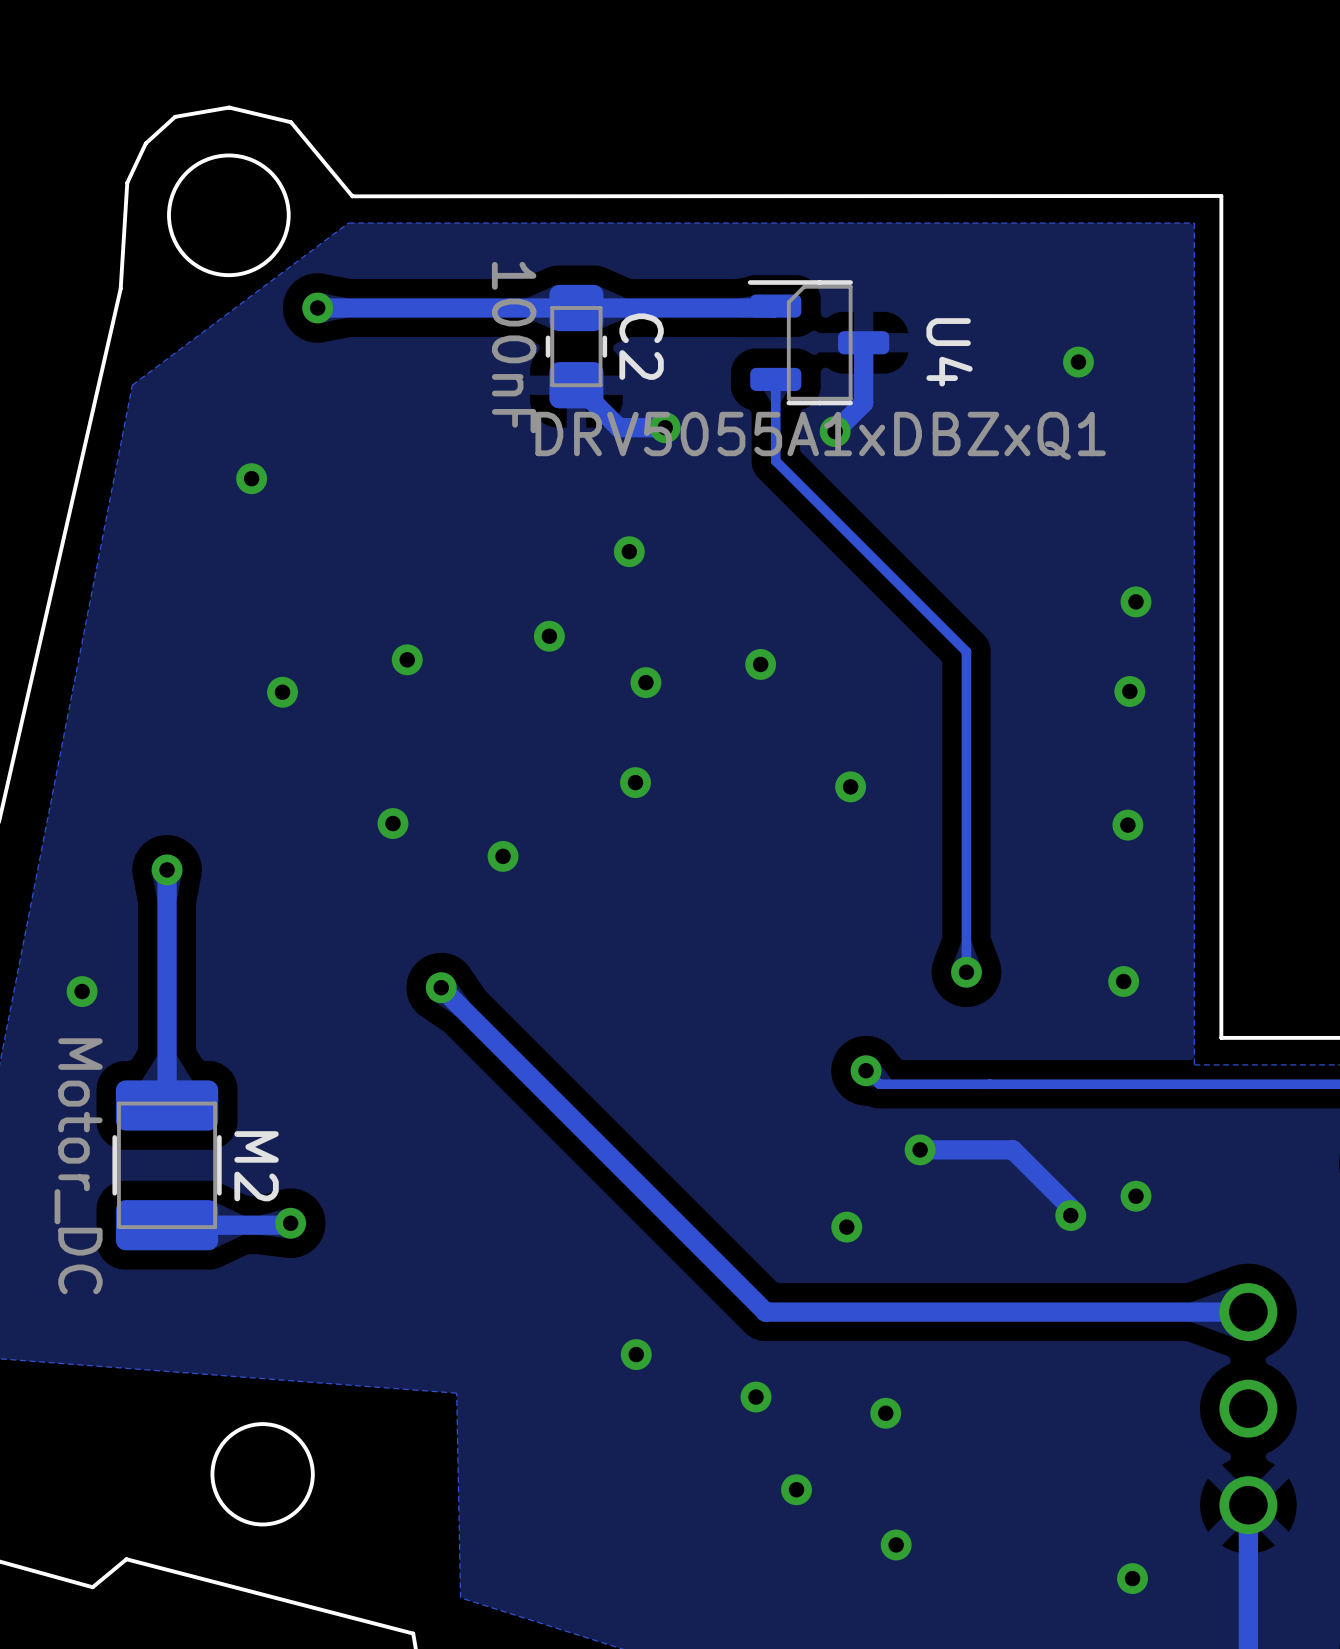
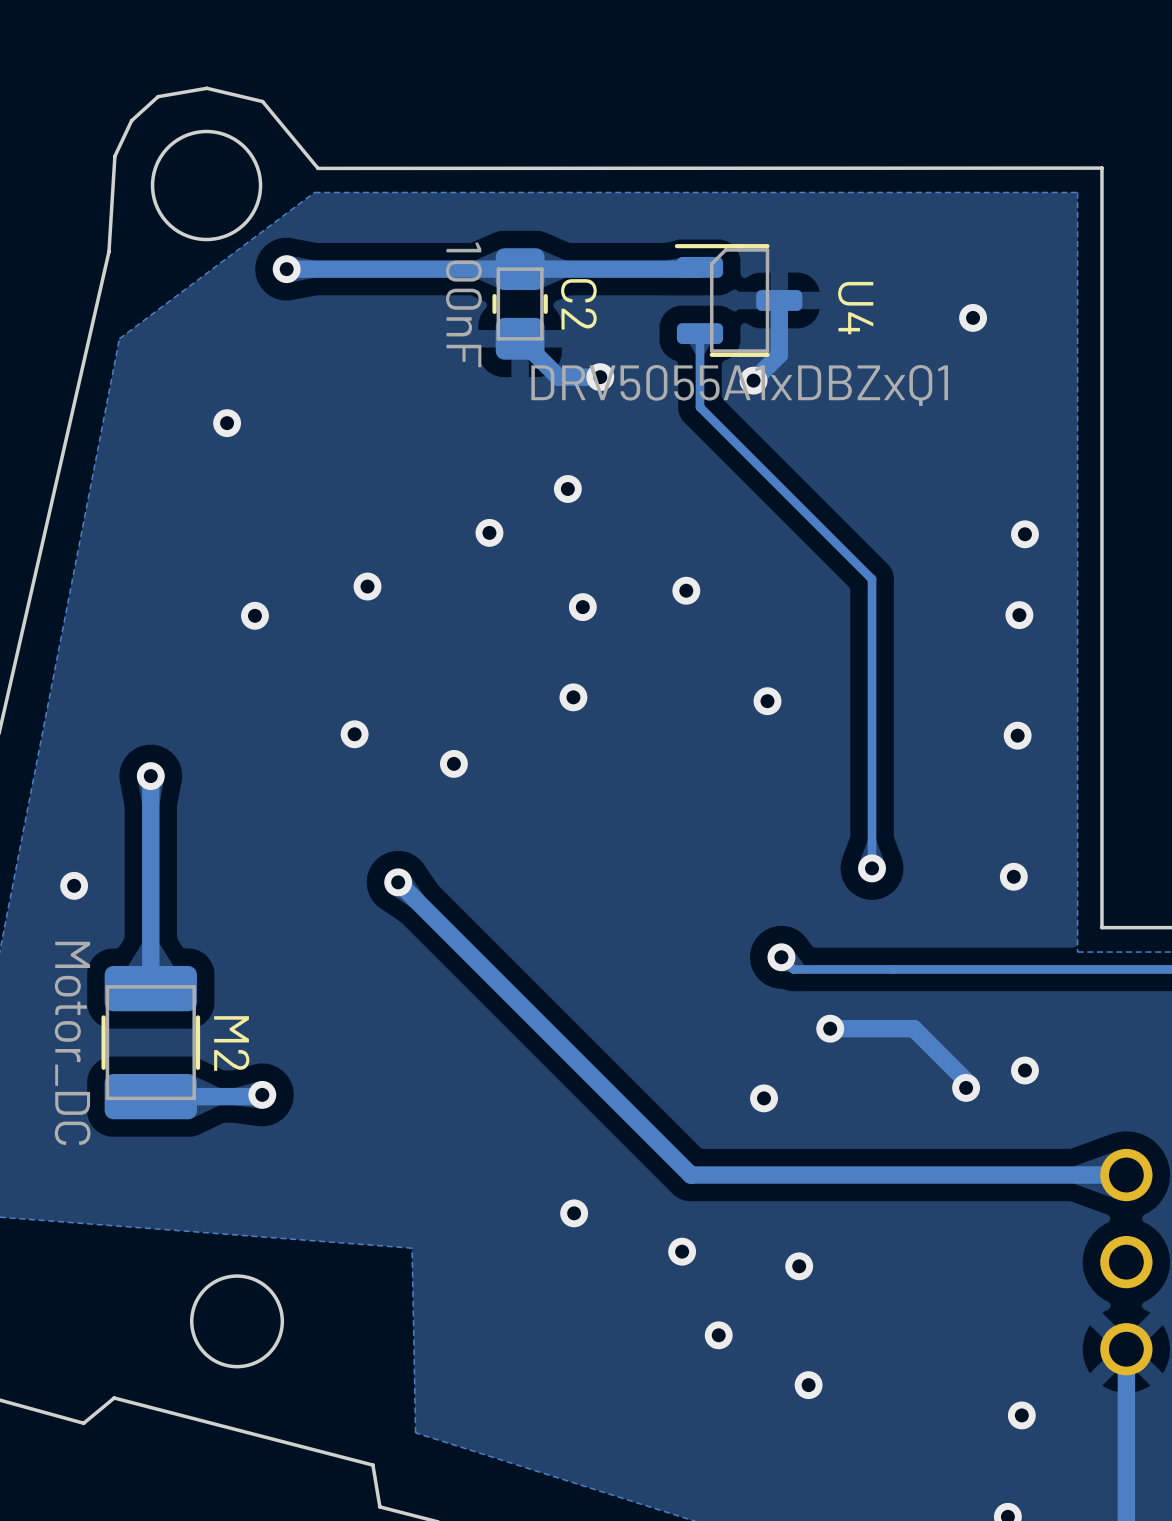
via position: (549, 636) -> (489, 532)

